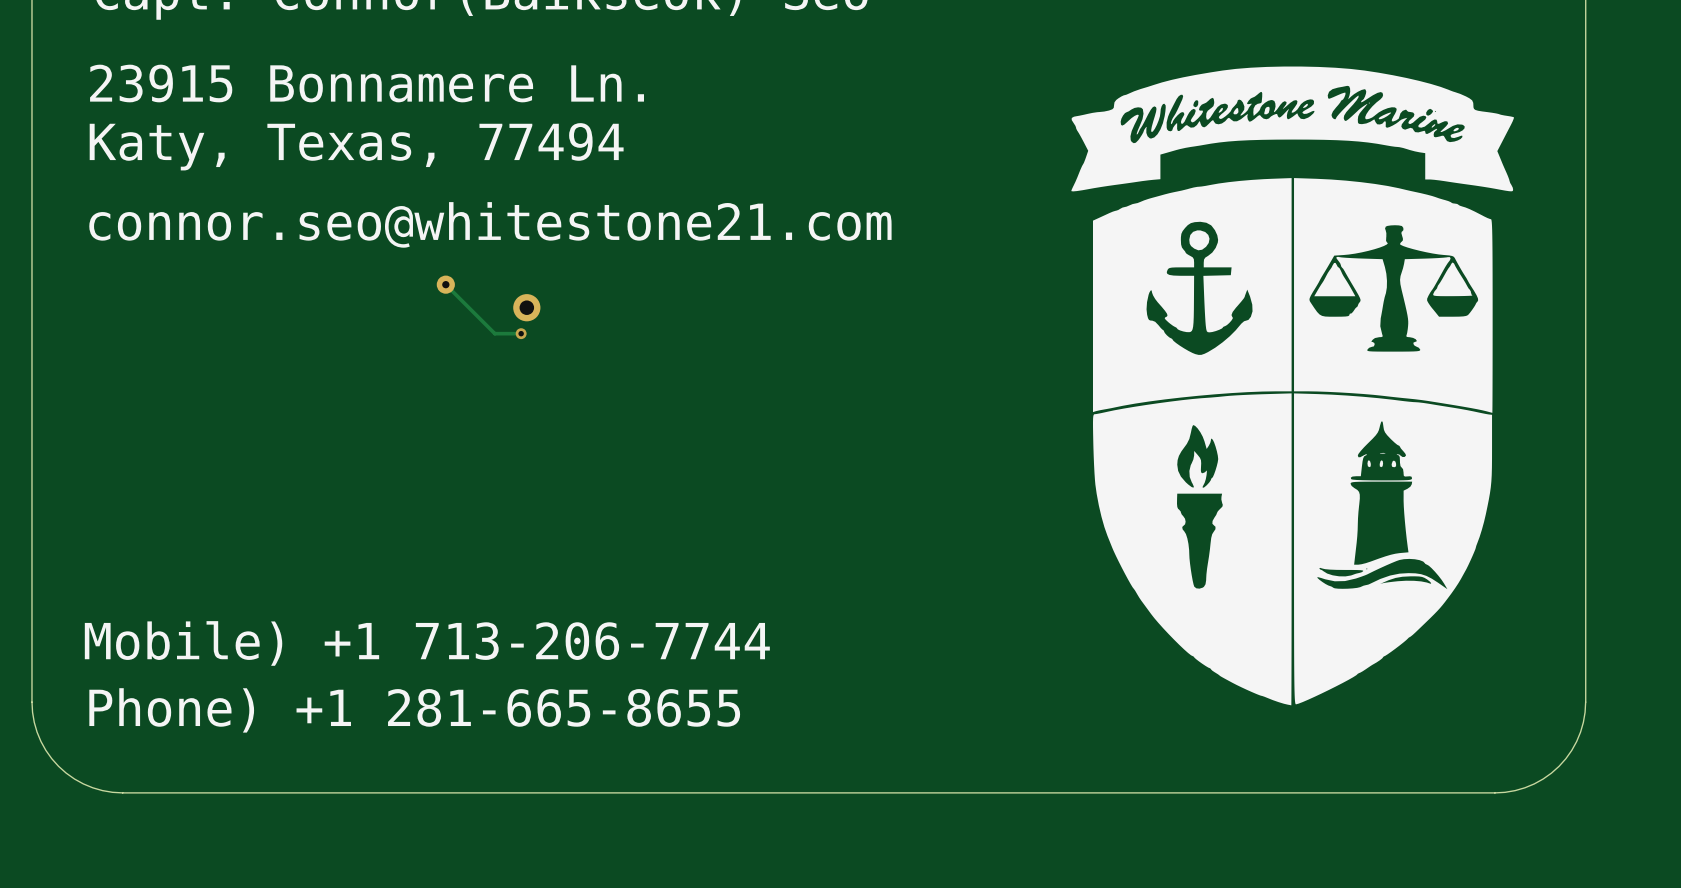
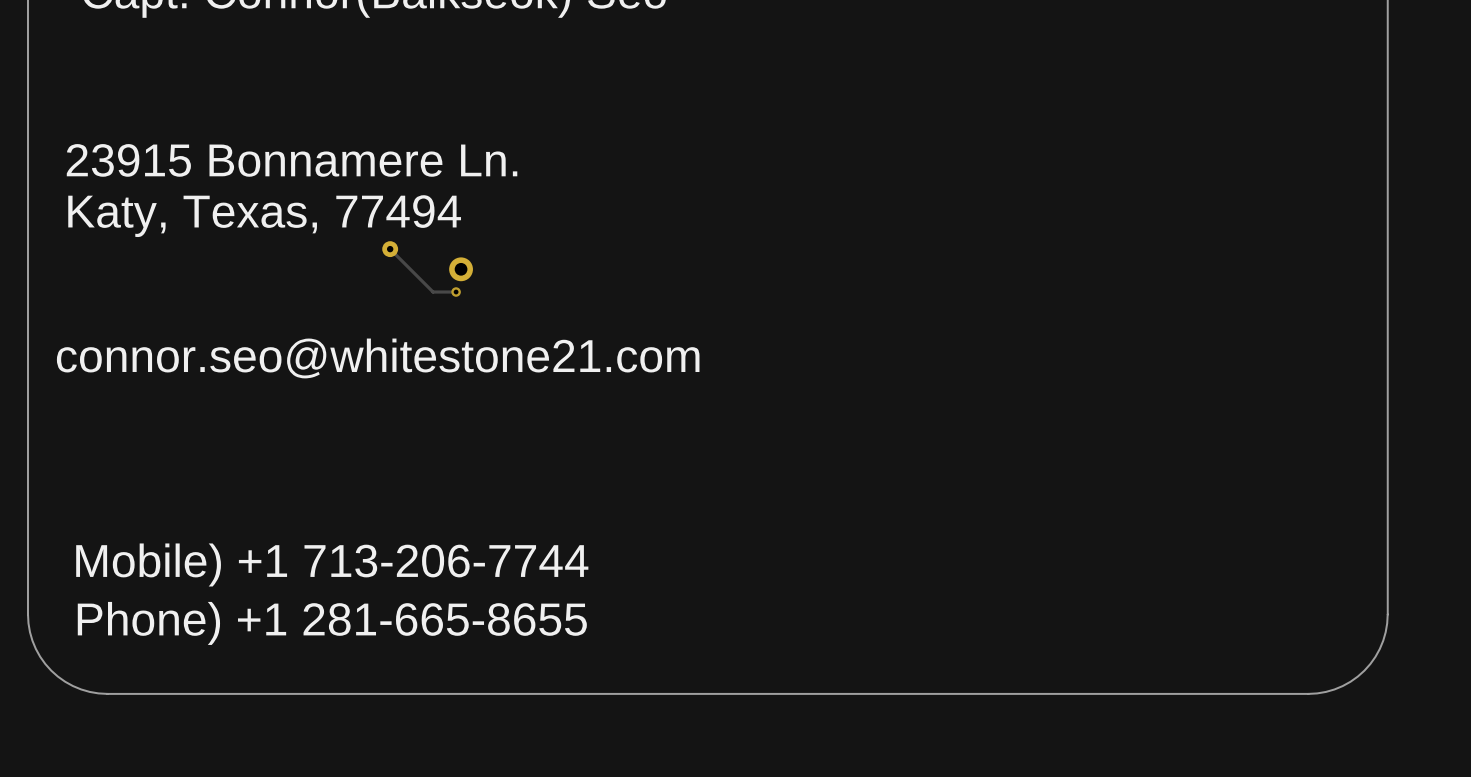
drawing: [1071, 66, 1514, 706] -> none
text position: 23915 Bonnamere Ln. (367, 83) -> 23915 Bonnamere Ln. (292, 160)
text position: Katy, Texas, 77494 (356, 146) -> Katy, Texas, 77494 (264, 216)
text position: connor.seo@whitestone21.com (490, 224) -> connor.seo@whitestone21.com (378, 358)

